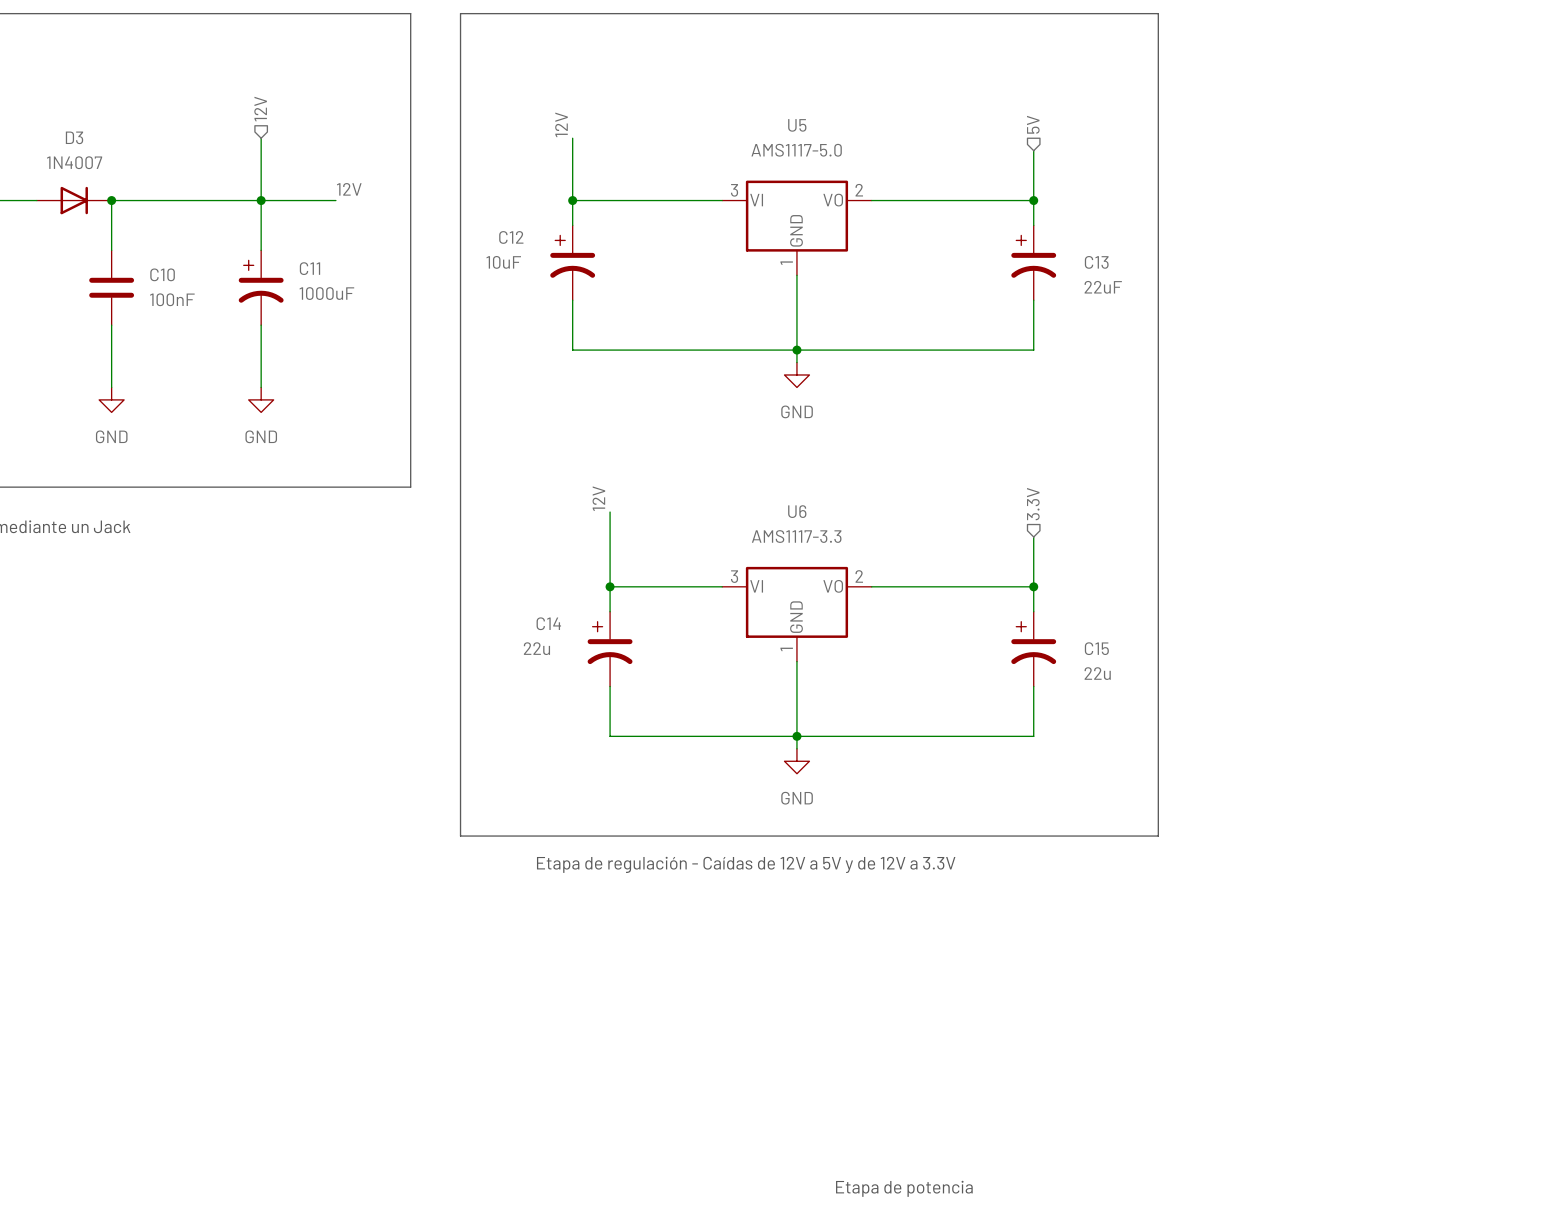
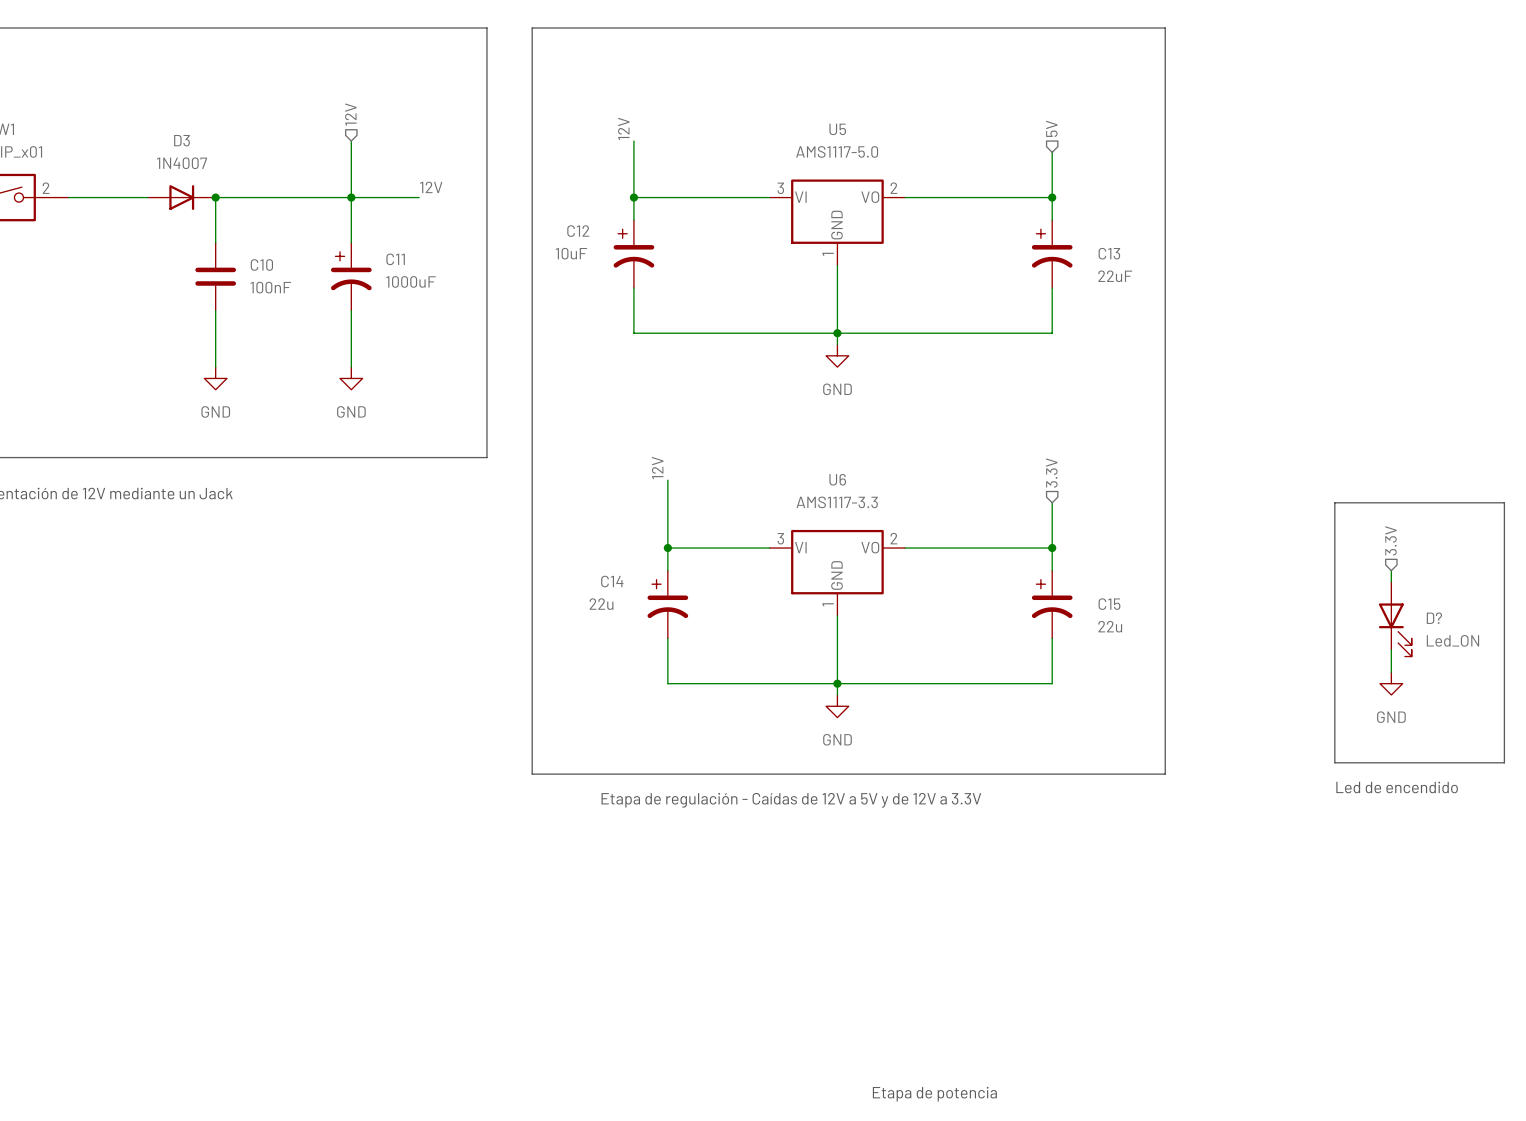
line: none -> (1334, 502) (1334, 762) (1504, 762) (1504, 502) (1334, 502)
hierarchical label: none -> 3.3V (1390, 540)
wire: none -> (1391, 570) (1391, 581)
D?: none -> Led_ON (1395, 619)
wire: none -> (1391, 649) (1391, 672)
power symbol: none -> GND (1391, 683)
text: none -> Led de encendido (1397, 787)

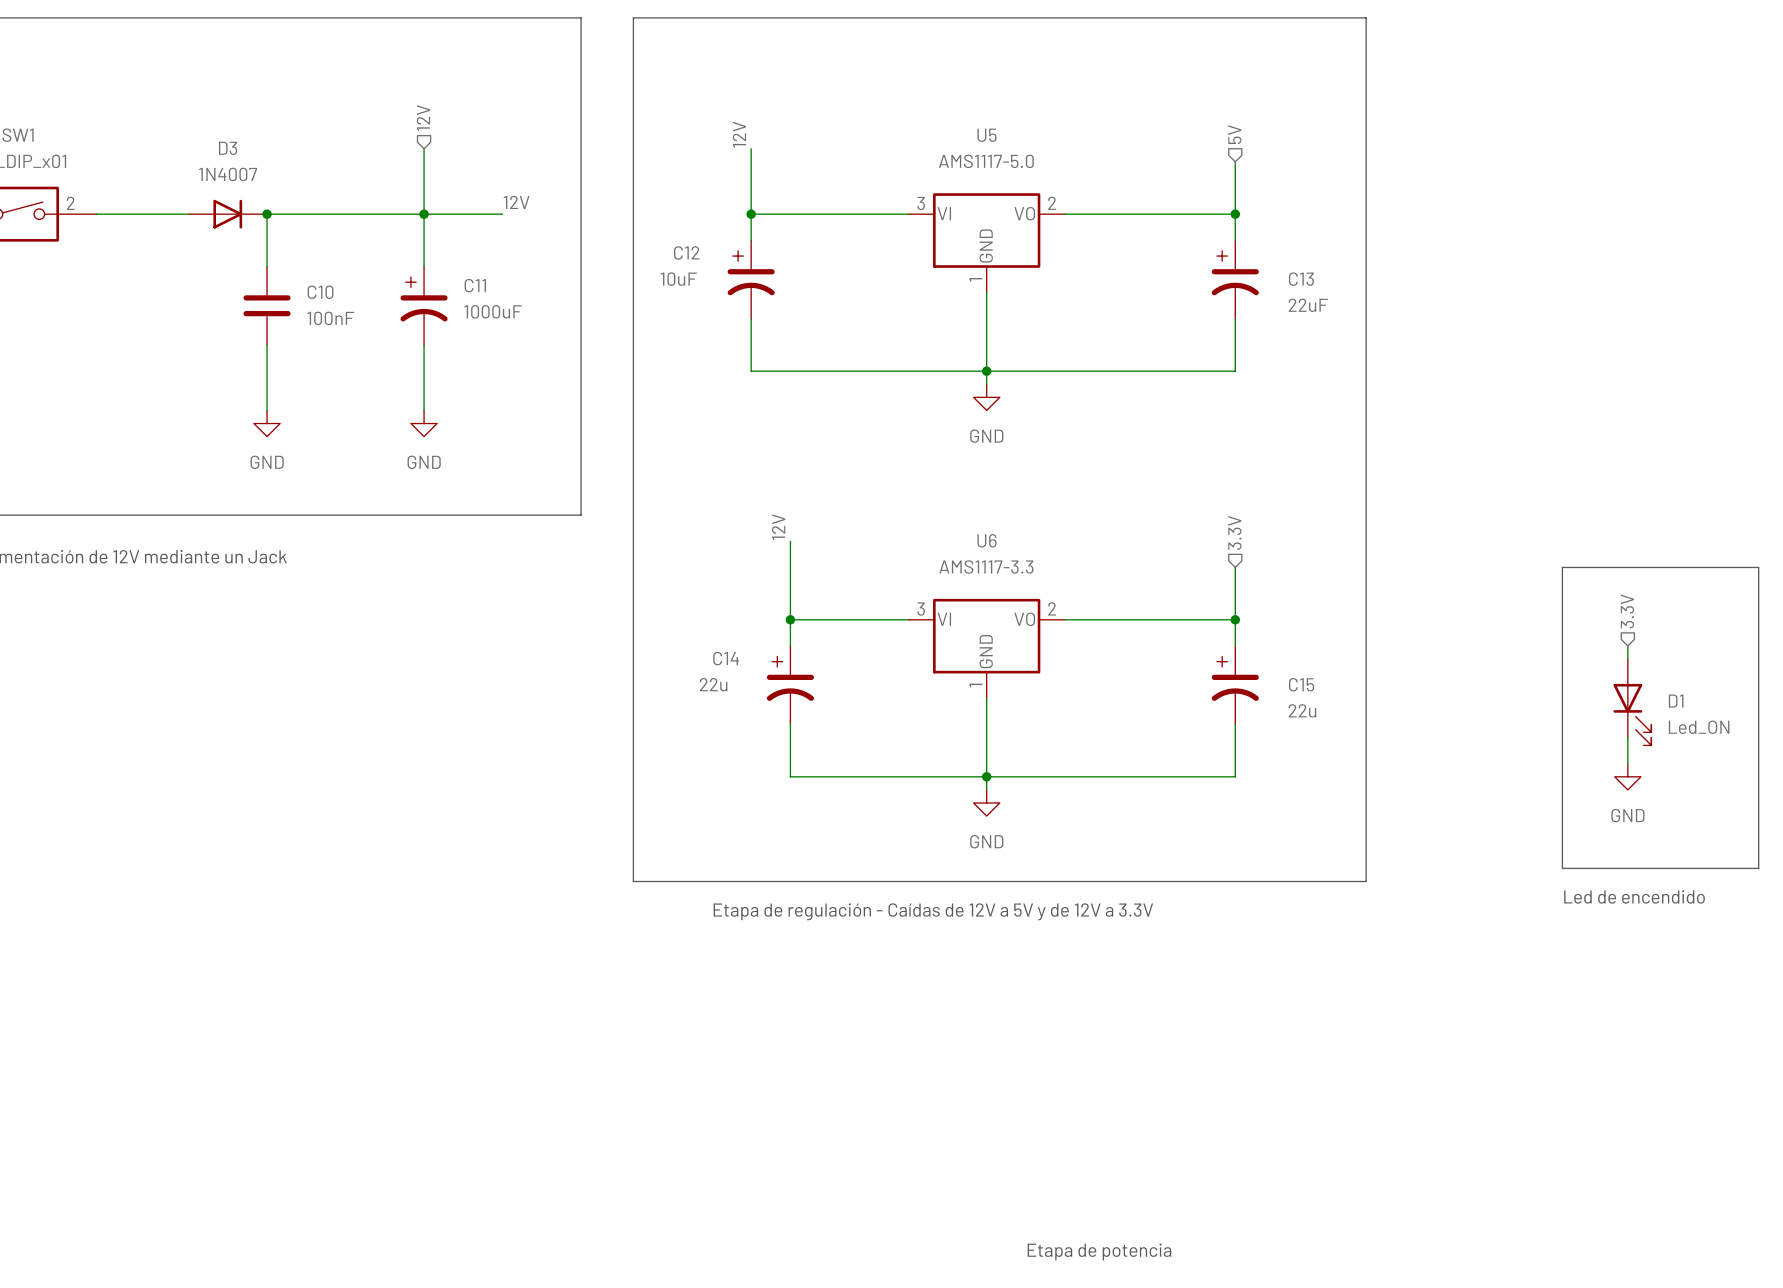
D? name: D? (1434, 618) -> D1 (1676, 701)

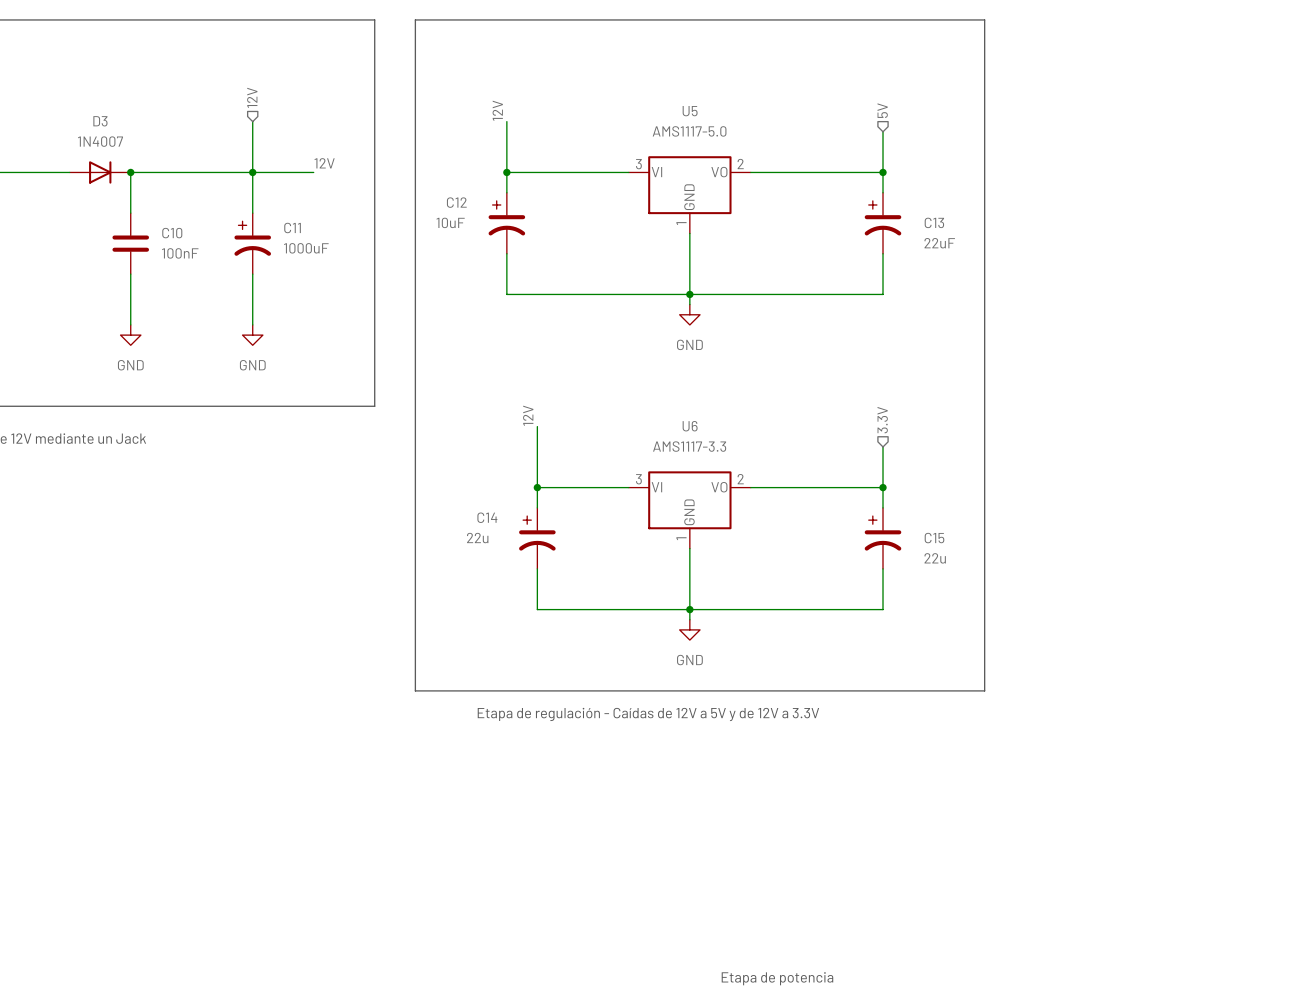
line: (1562, 567) (1562, 868) (1758, 868) (1758, 567) (1562, 567) -> none
hierarchical label: 3.3V (1627, 611) -> none
wire: (1627, 645) (1627, 659) -> none
D1: Led_ON (1632, 702) -> none
wire: (1627, 737) (1627, 763) -> none
power symbol: GND (1627, 776) -> none
text: Led de encendido (1634, 896) -> none

